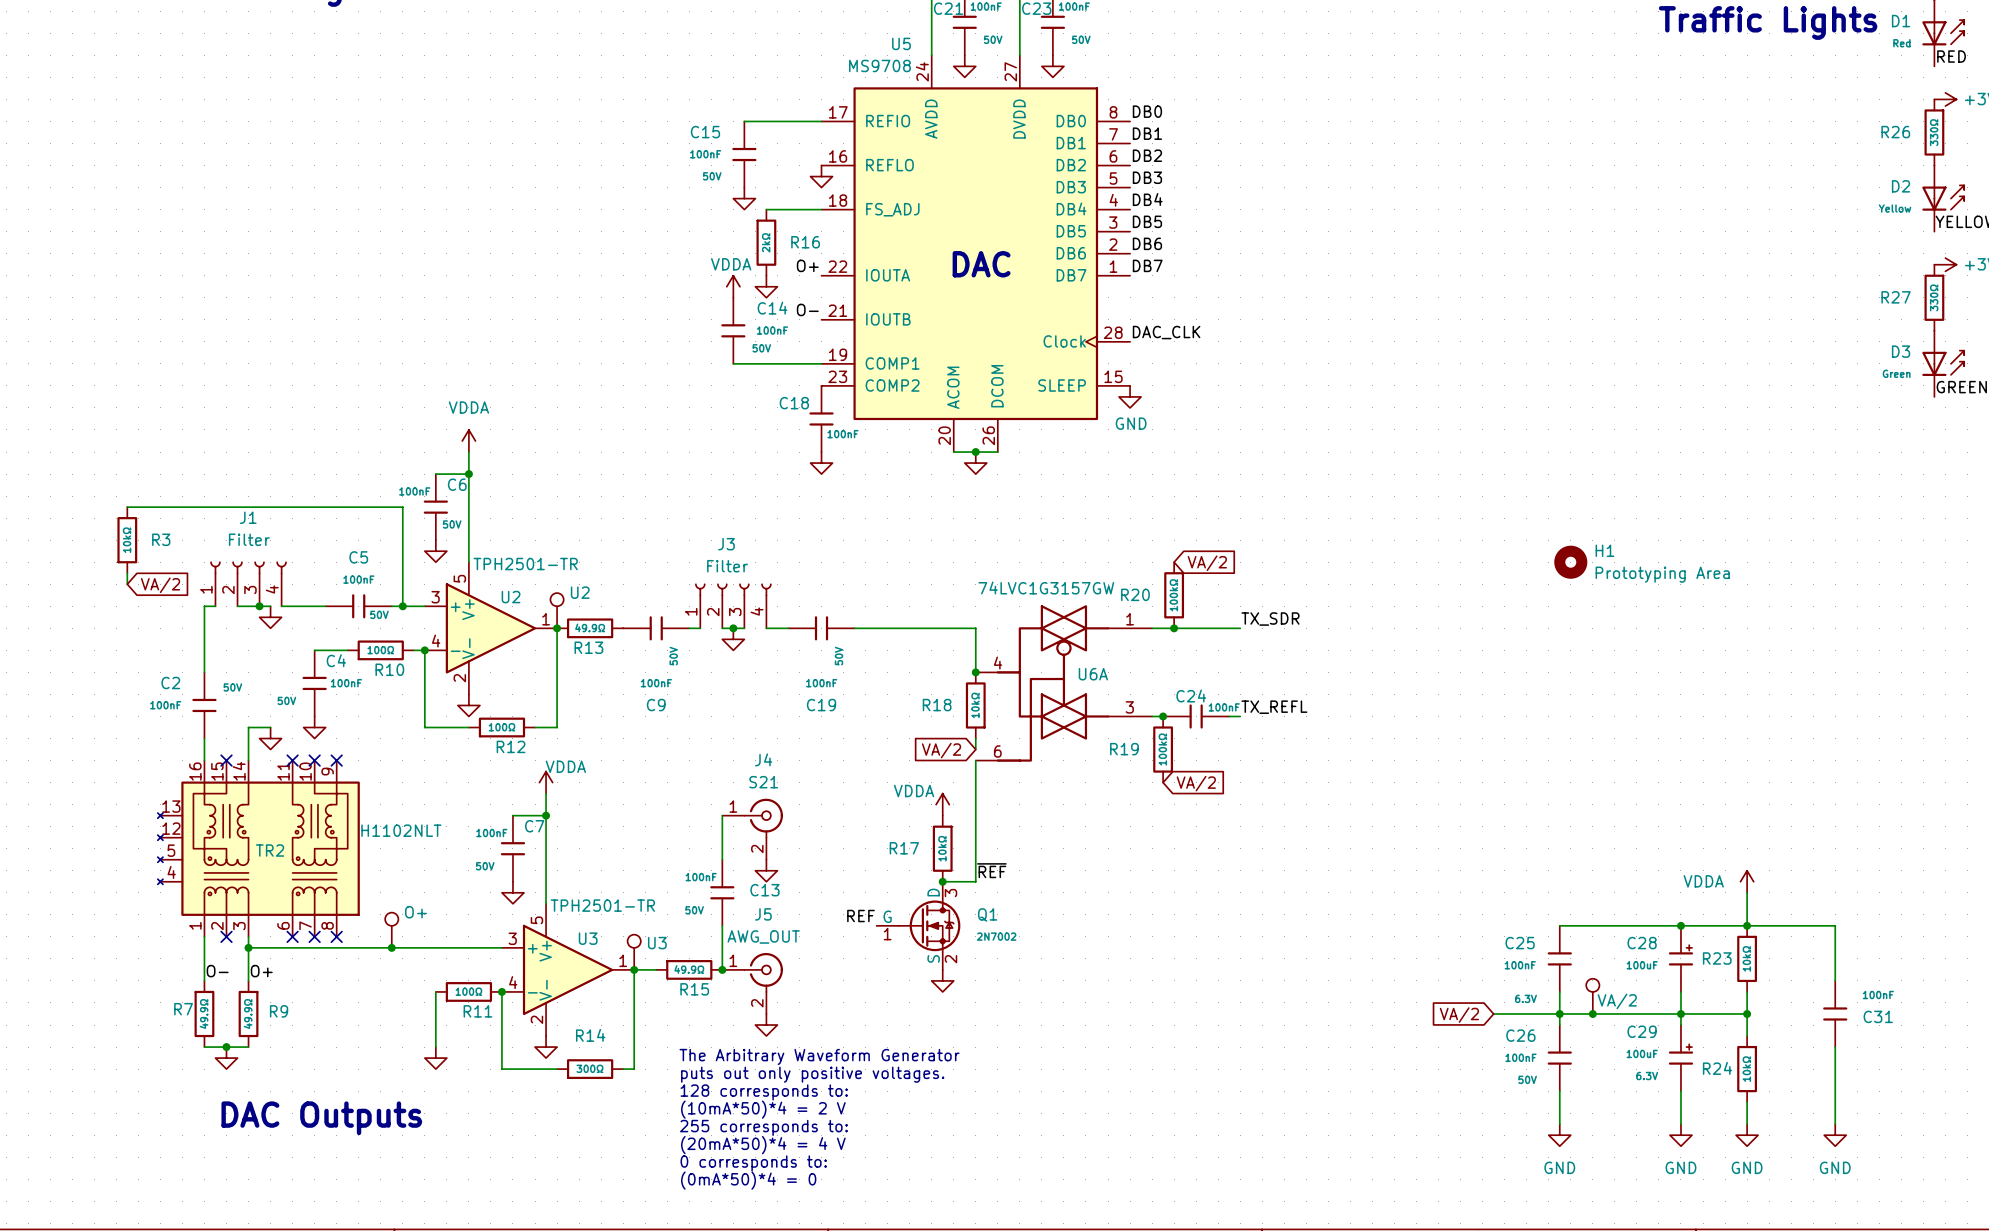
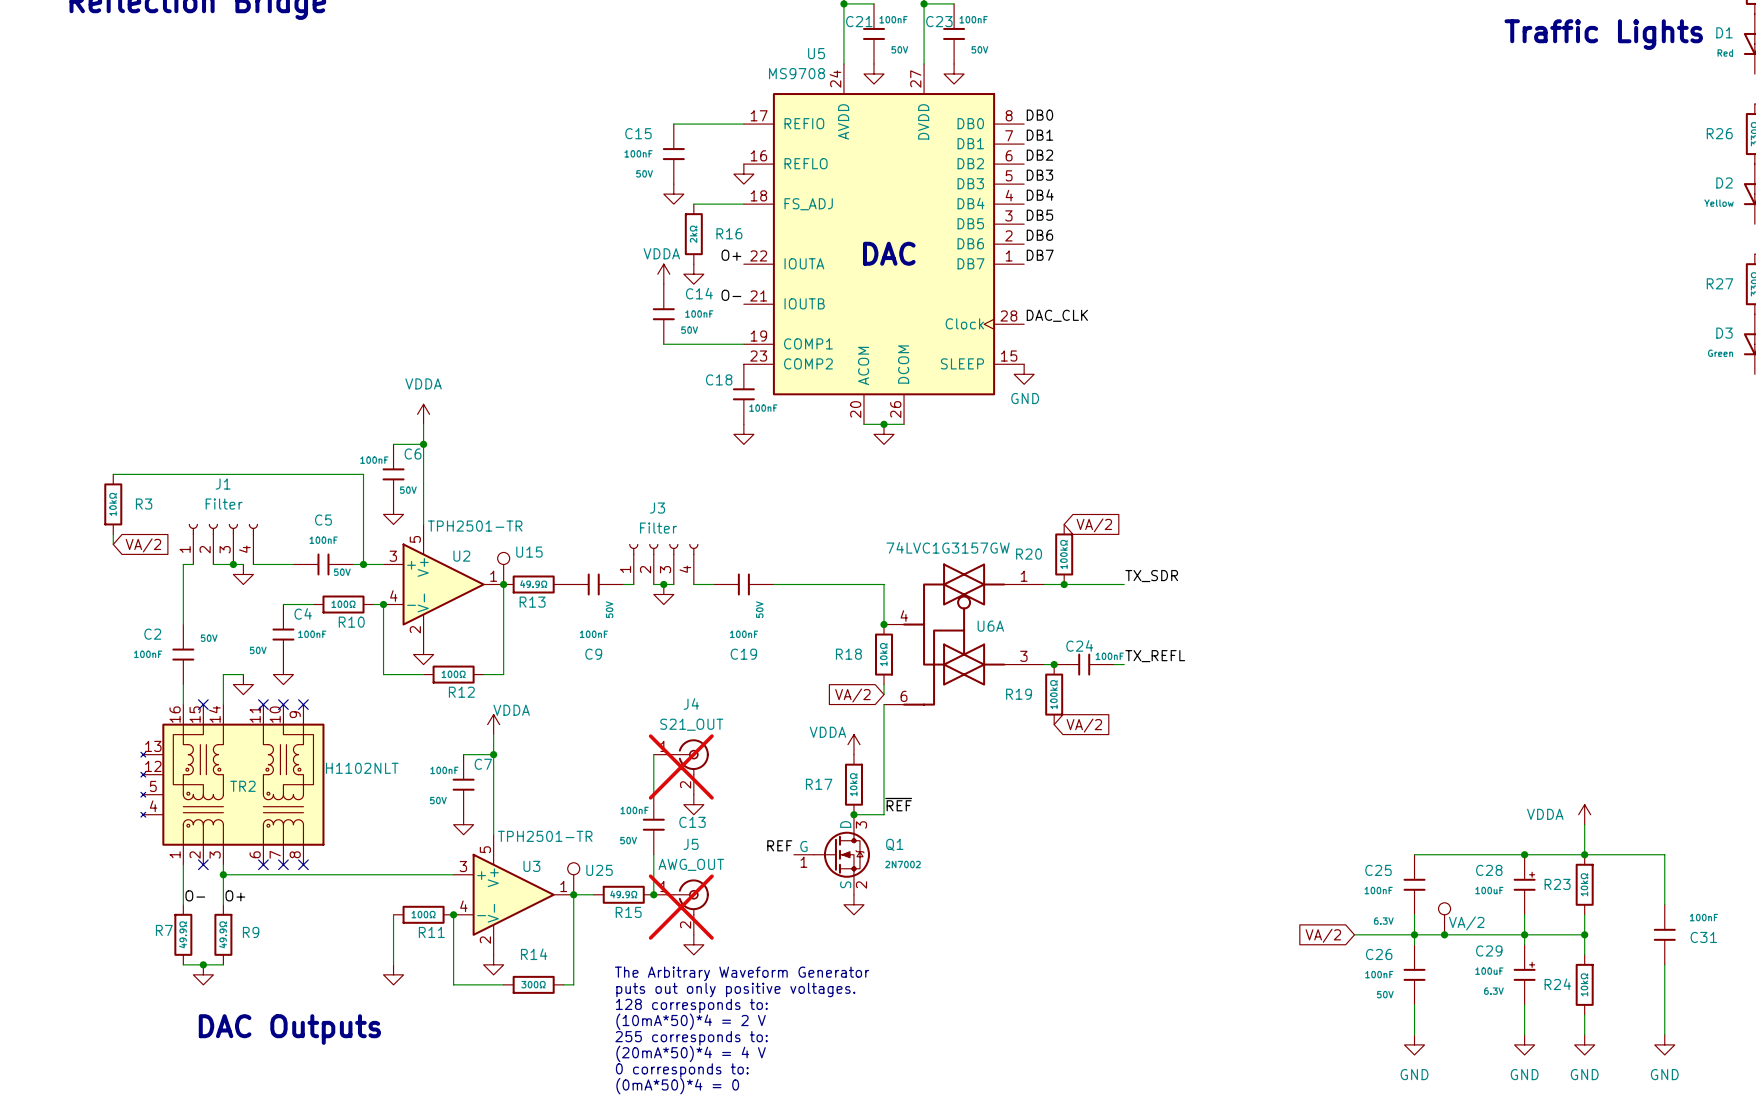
H1: Prototyping Area (1570, 562) -> none
part value: U2 (580, 592) -> U15 (529, 552)
J4 value: S21 (763, 782) -> S21_OUT (691, 724)
J4 do-not-place cross: none -> (681, 766)
part: O+ (391, 930) -> none
part value: U3 (657, 943) -> U25 (599, 870)
junction: (391, 947) -> none
J5 do-not-place cross: none -> (681, 907)

